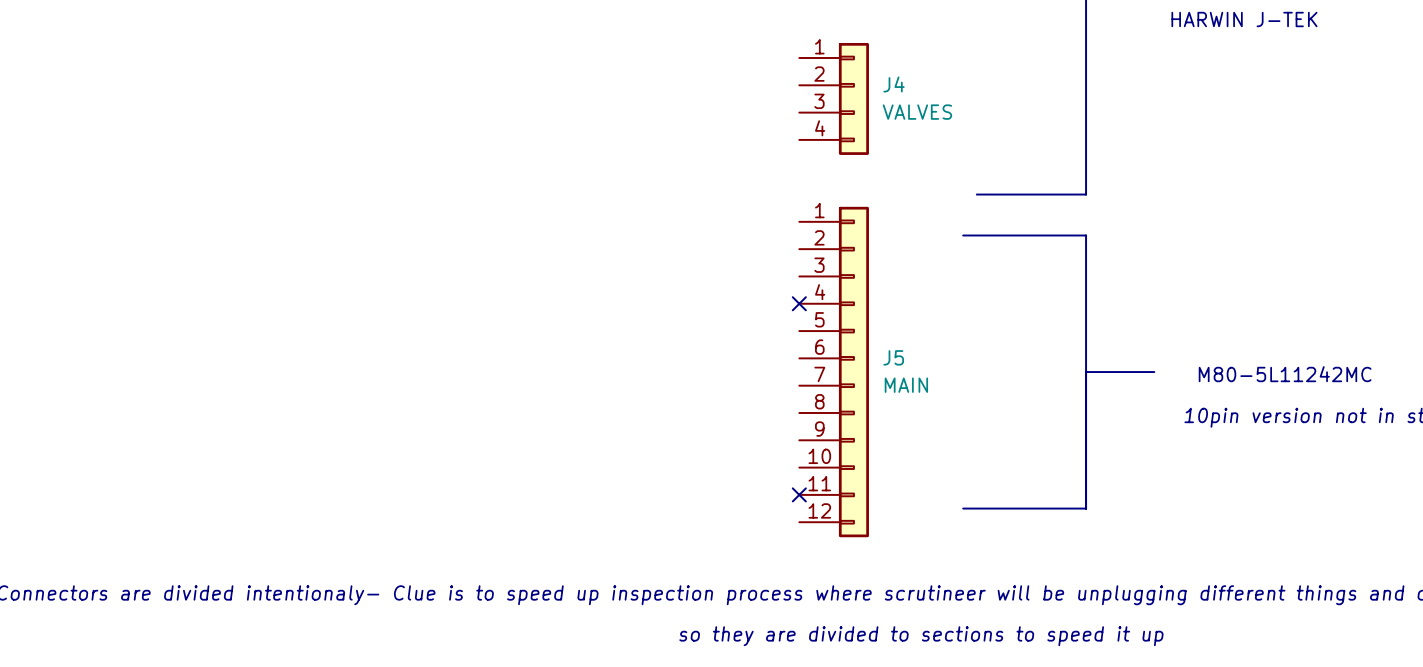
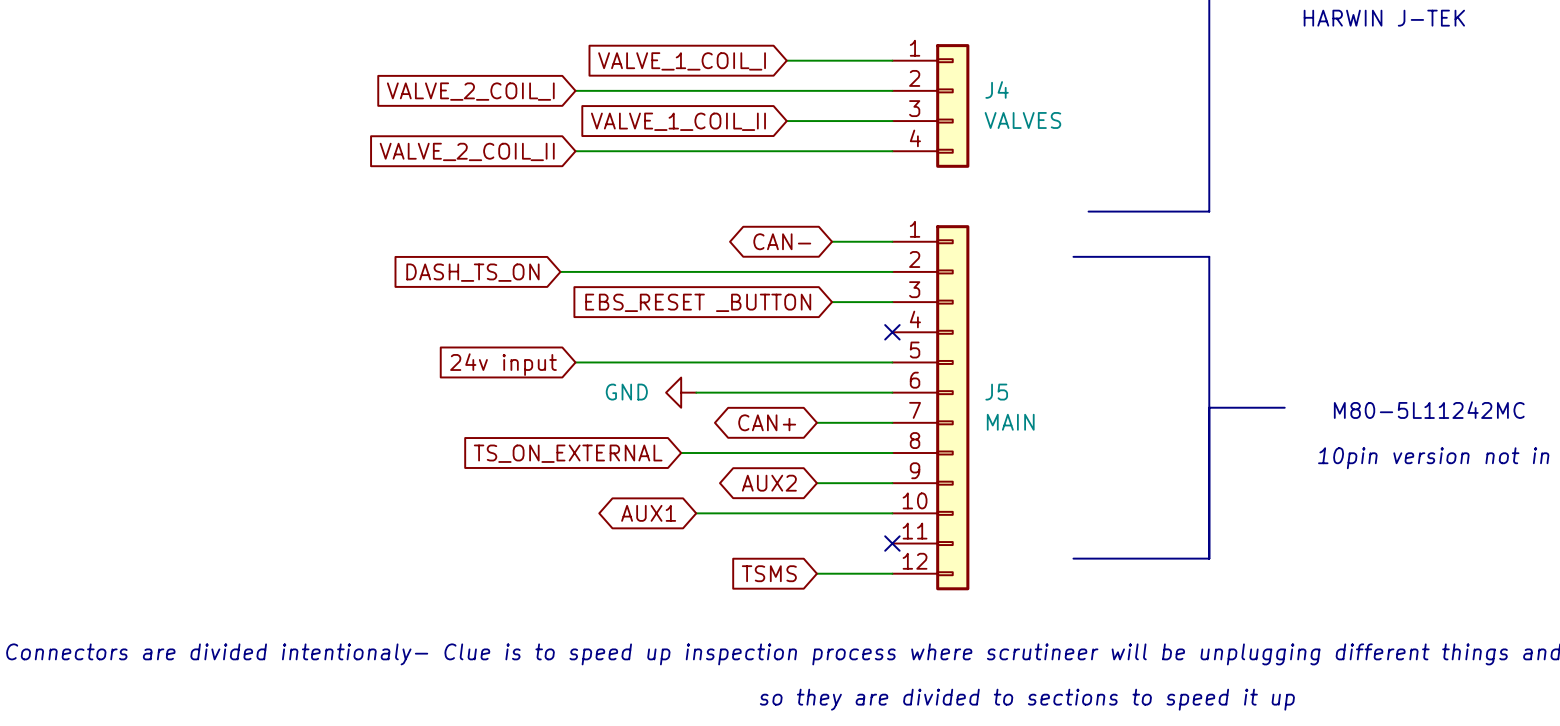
global label: none -> VALVE_1_COIL_I (682, 61)
wire: none -> (786, 60) (892, 60)
global label: none -> VALVE_2_COIL_I (470, 91)
wire: none -> (575, 90) (892, 90)
wire: none -> (786, 121) (892, 121)
global label: none -> VALVE_1_COIL_II (678, 121)
wire: none -> (575, 151) (892, 151)
global label: none -> VALVE_2_COIL_II (467, 151)
global label: none -> CAN- (782, 241)
wire: none -> (832, 241) (892, 241)
global label: none -> DASH_TS_ON (472, 272)
wire: none -> (560, 271) (892, 271)
wire: none -> (832, 302) (892, 302)
global label: none -> EBS_RESET _BUTTON (698, 302)
wire: none -> (575, 362) (892, 362)
global label: none -> 24v input (503, 364)
power symbol: none -> GND (681, 392)
wire: none -> (696, 392) (892, 392)
global label: none -> CAN+ (767, 422)
wire: none -> (816, 422) (892, 422)
wire: none -> (681, 453) (892, 453)
global label: none -> TS_ON_EXTERNAL (568, 453)
global label: none -> AUX2 (769, 483)
wire: none -> (816, 483) (892, 483)
global label: none -> AUX1 (648, 513)
wire: none -> (696, 513) (892, 513)
global label: none -> TSMS (769, 573)
wire: none -> (816, 573) (892, 573)

